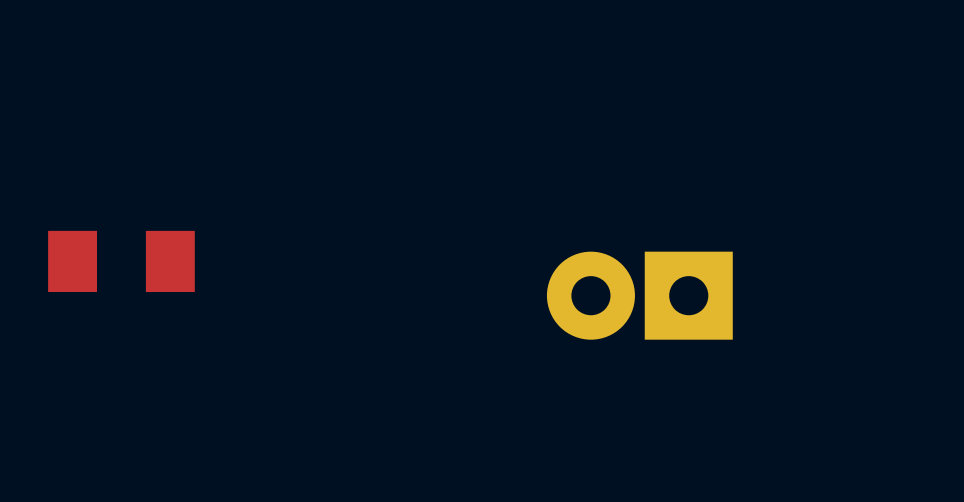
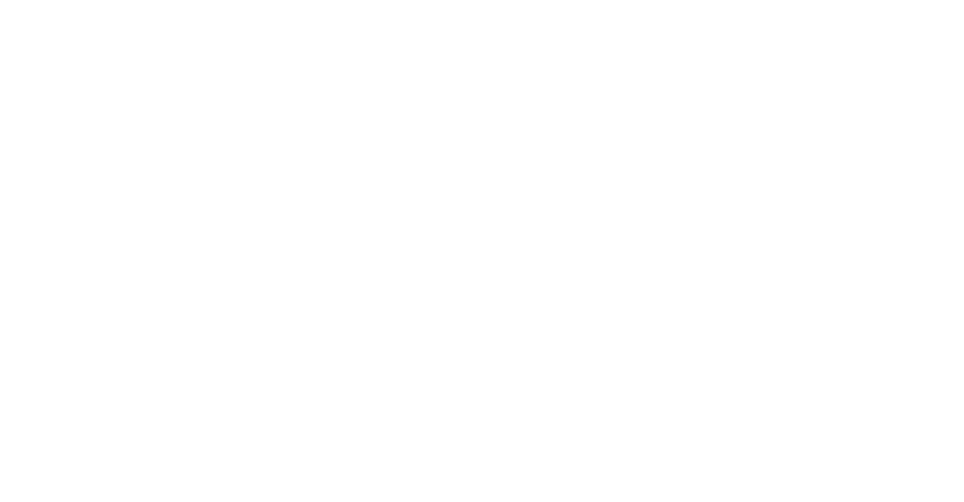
part: (121, 261) -> none
part: (639, 295) -> none

